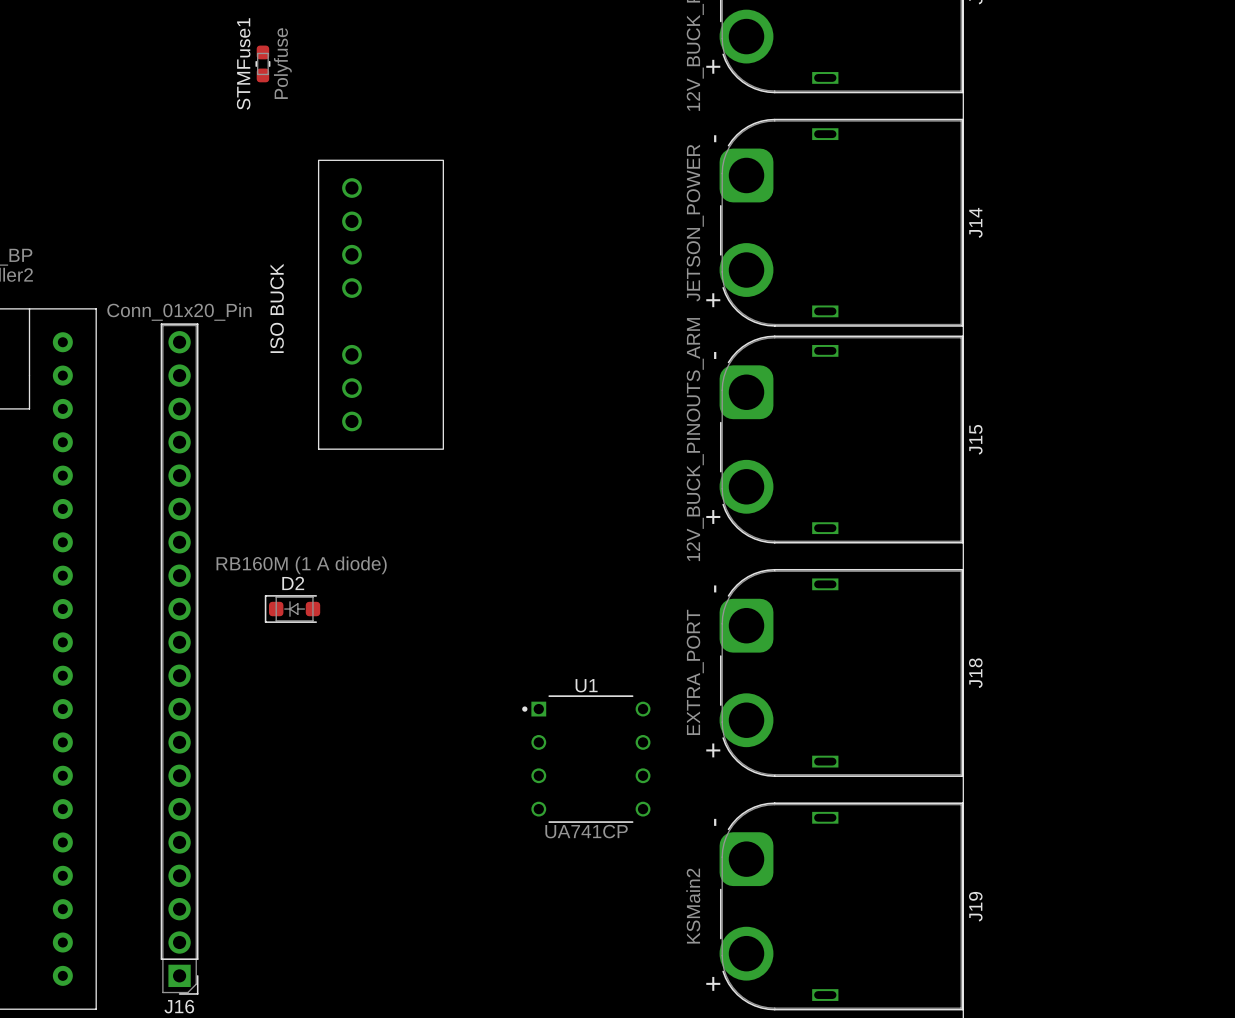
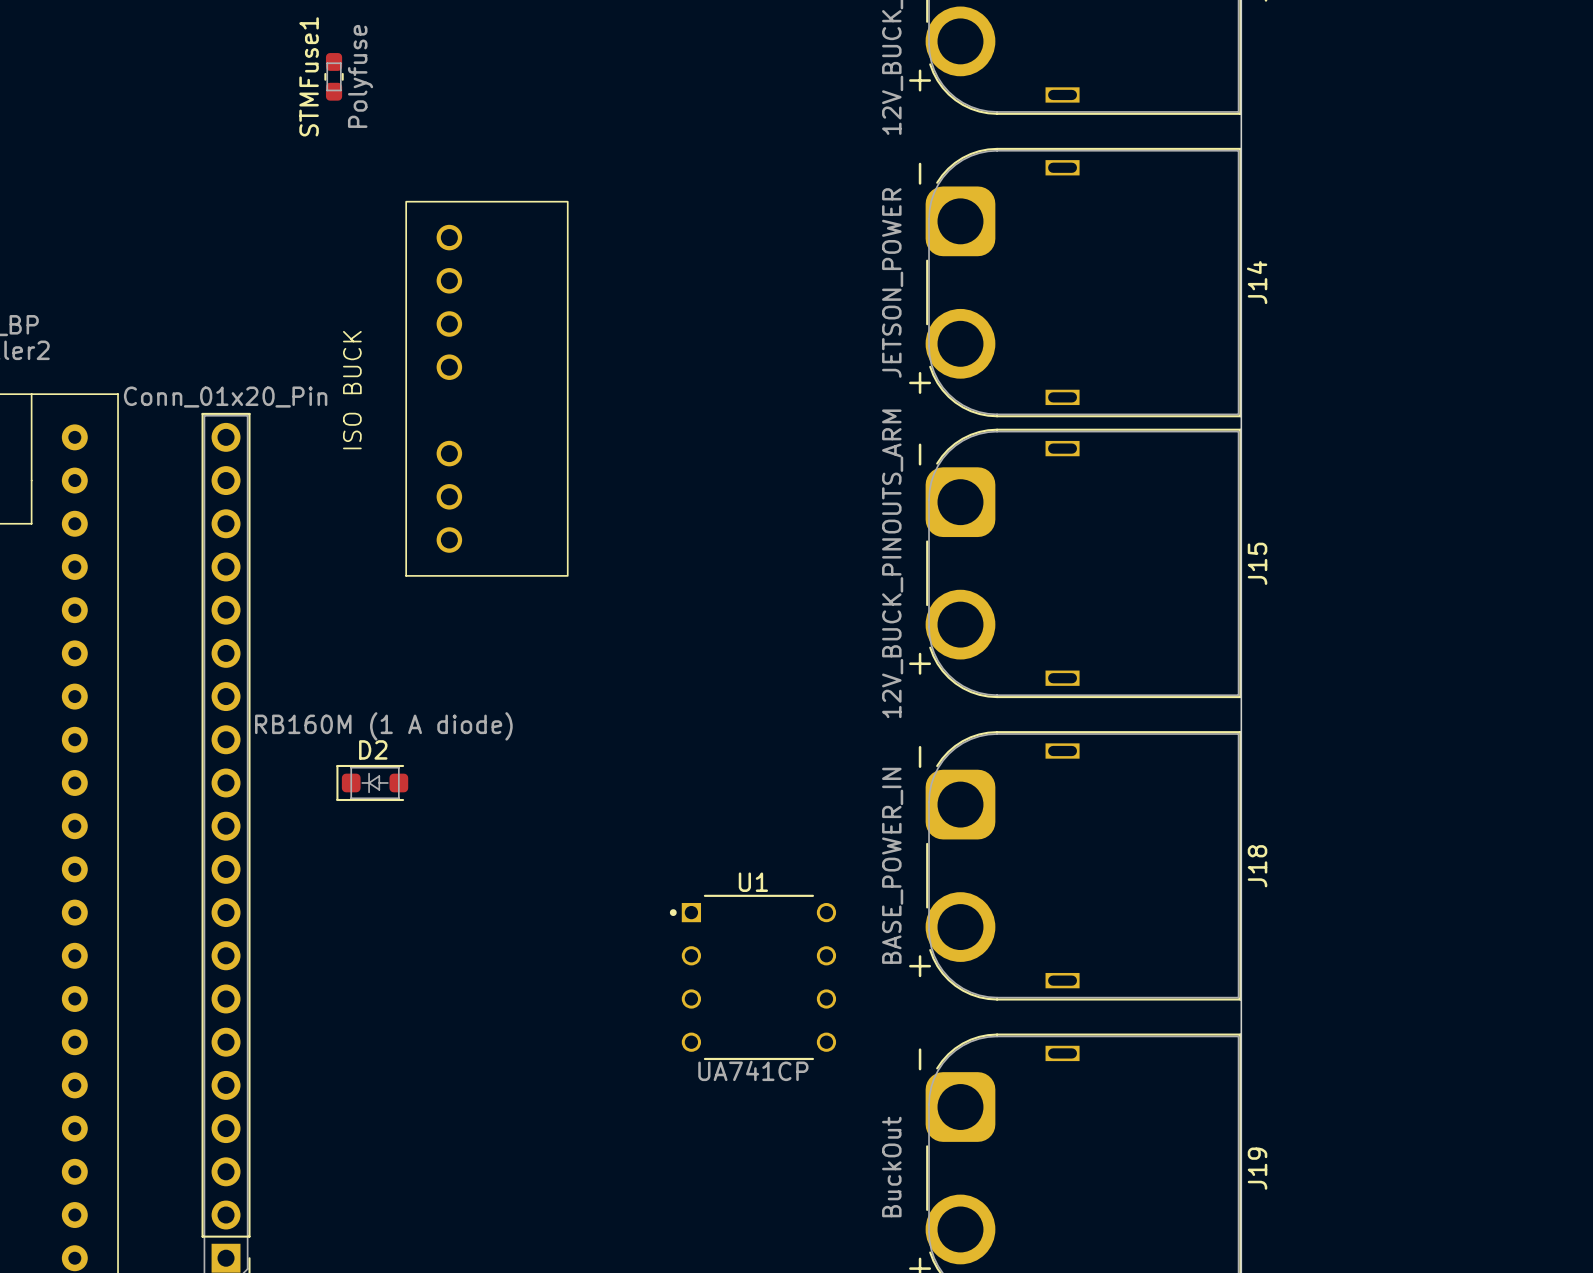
J18 value: EXTRA_PORT (695, 672) -> BASE_POWER_IN (892, 865)
J19 value: KSMain2 (693, 906) -> BuckOut (891, 1167)

